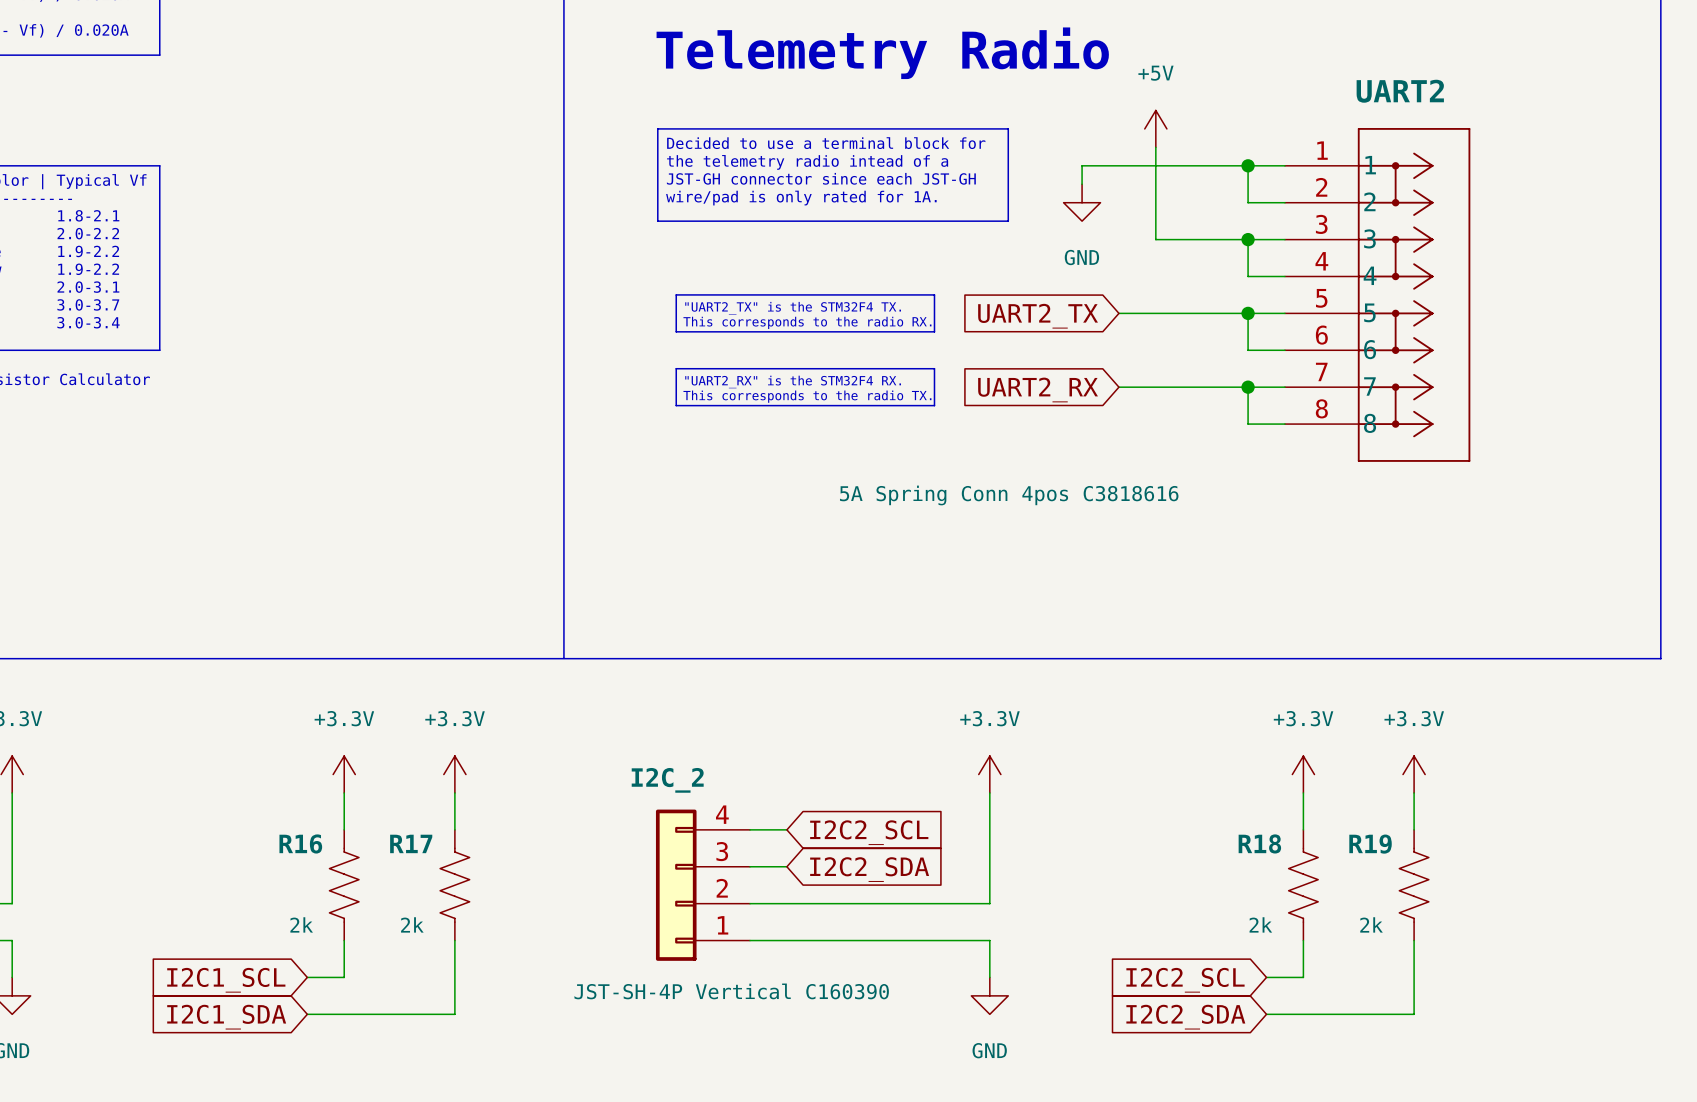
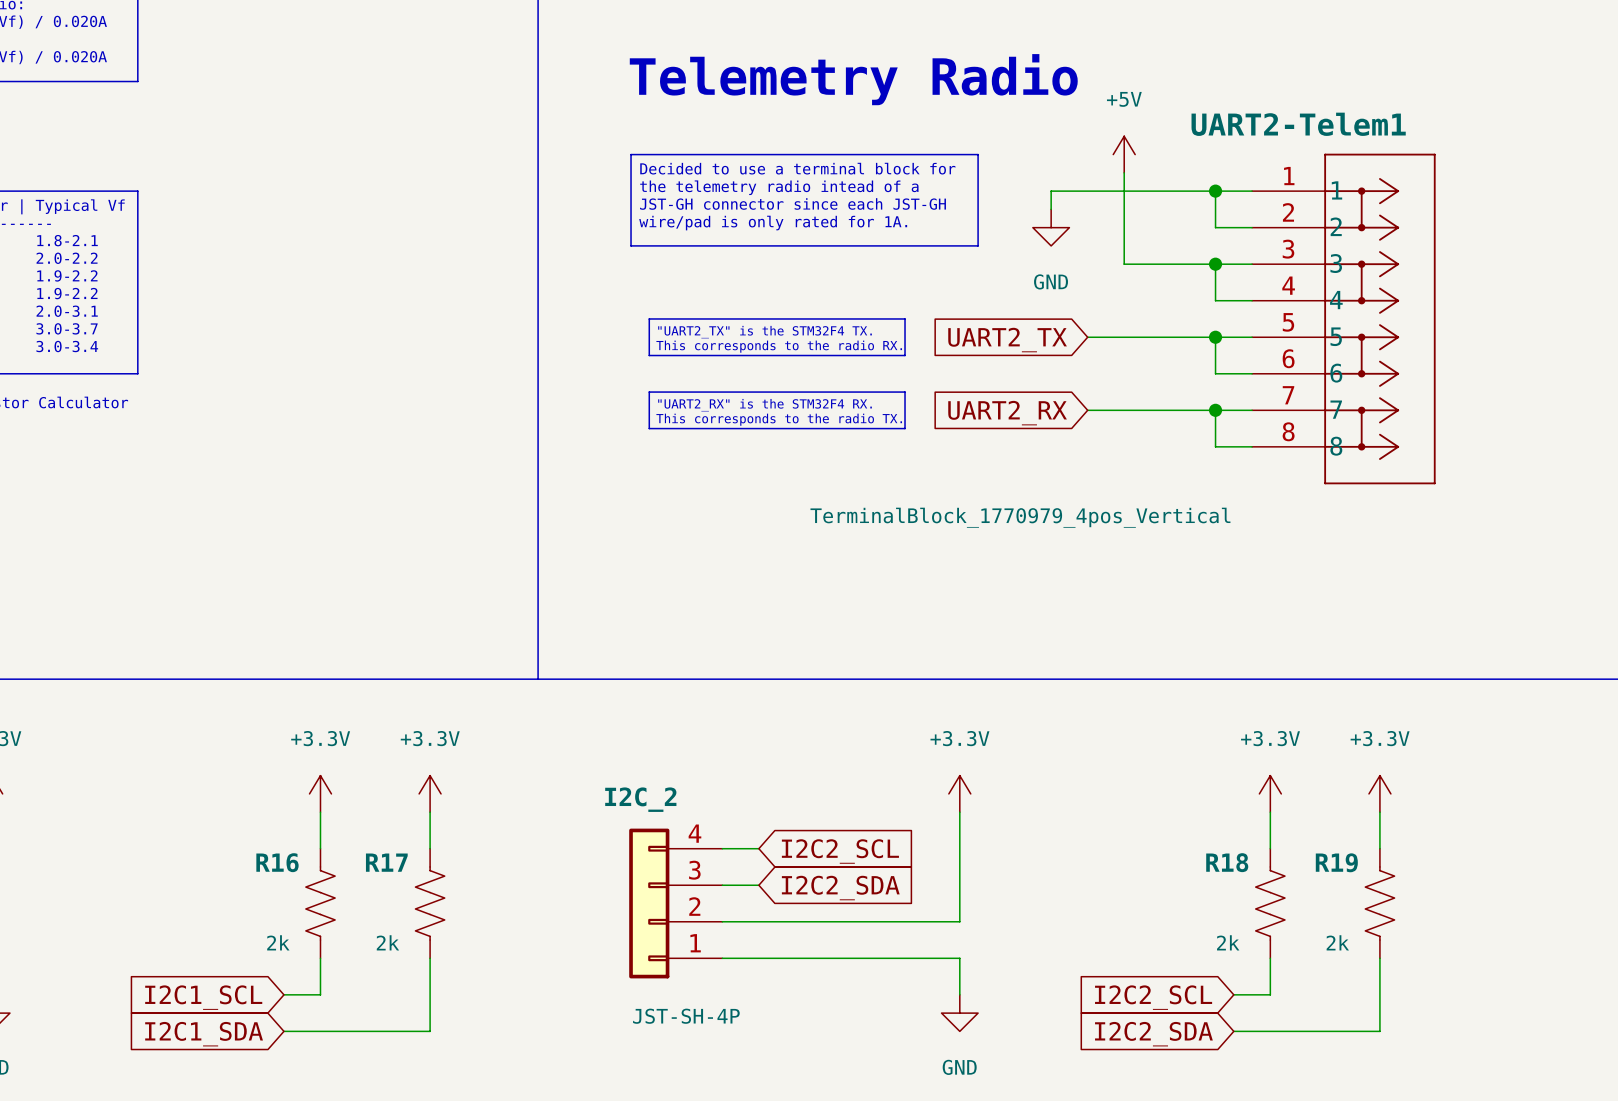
UART2 name: UART2 (1400, 91) -> UART2-Telem1 (1298, 124)
UART2 value: 5A Spring Conn 4pos C3818616 (1009, 495) -> TerminalBlock_1770979_4pos_Vertical (1020, 517)
I2C_2 value: JST-SH-4P Vertical C160390 (731, 991) -> JST-SH-4P (686, 1016)

